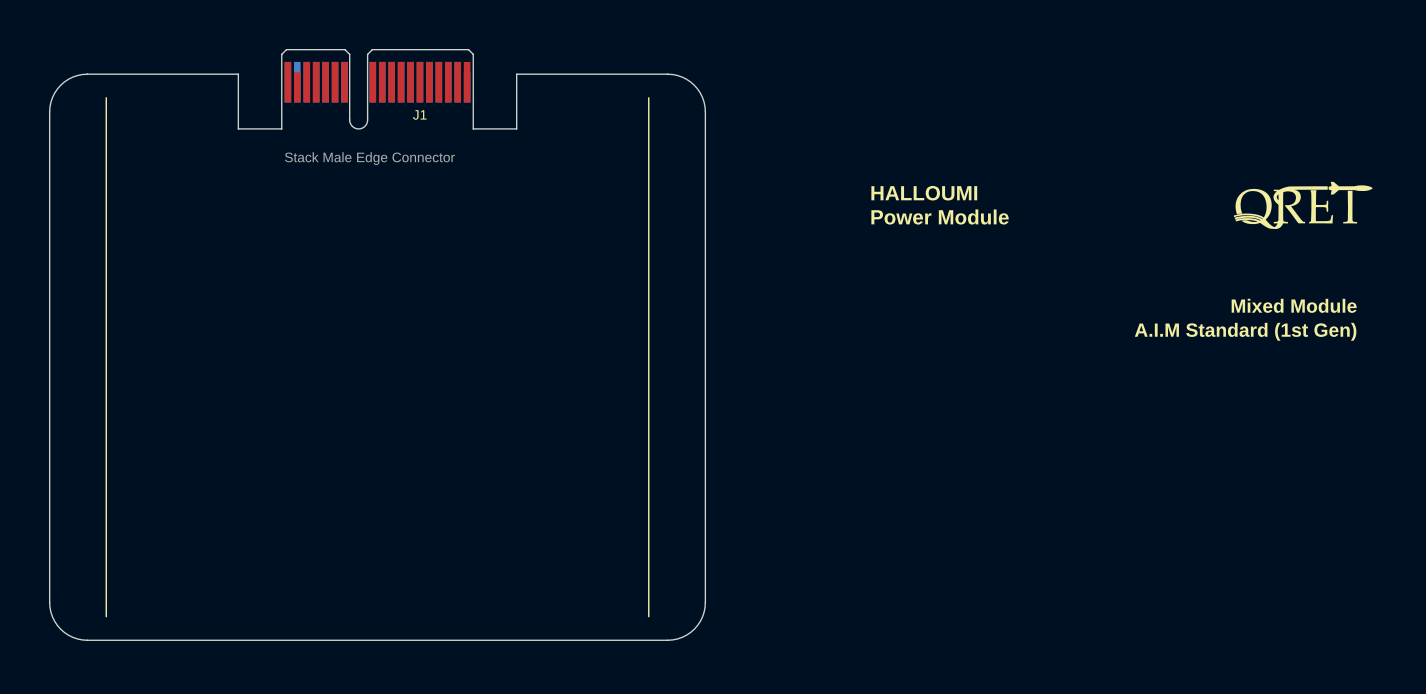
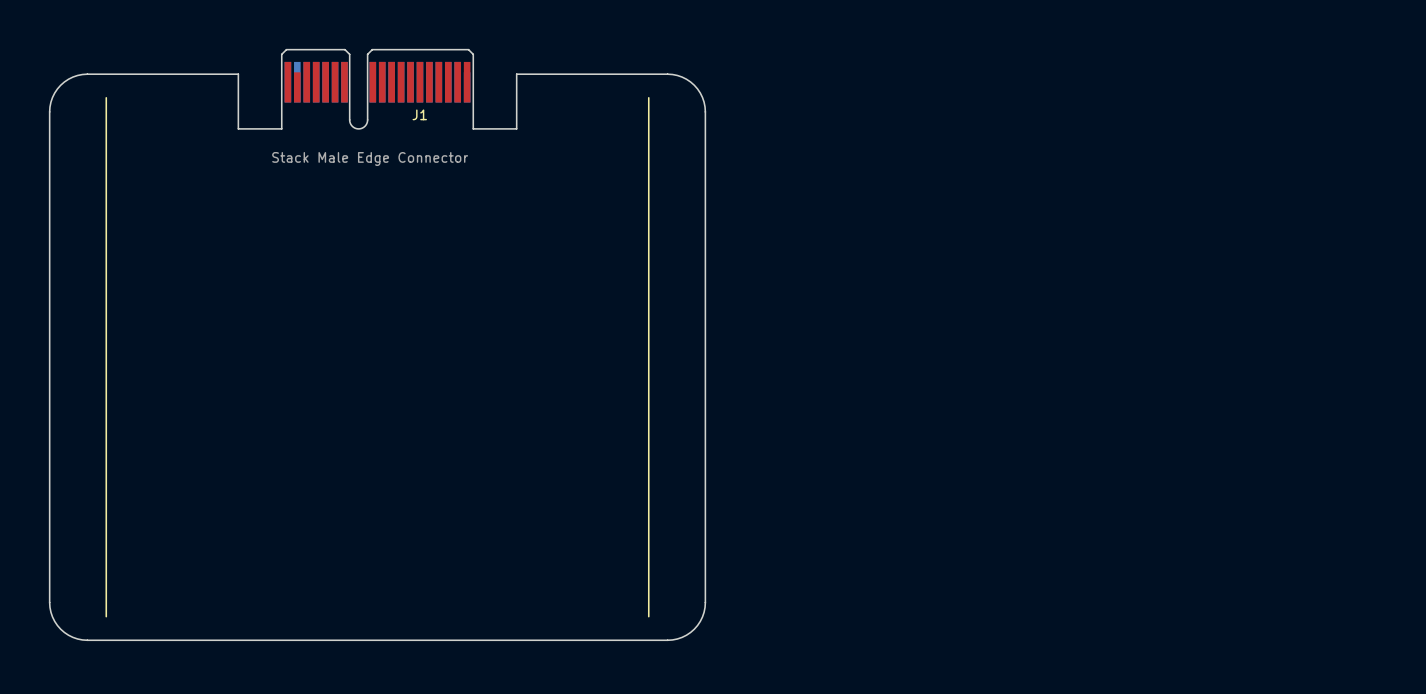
drawing: [1233, 181, 1373, 229] -> none
text: HALLOUMI (924, 193) -> none
text: Power Module (940, 217) -> none
text: Mixed Module (1294, 305) -> none
text: A.I.M Standard (1st Gen) (1245, 331) -> none

